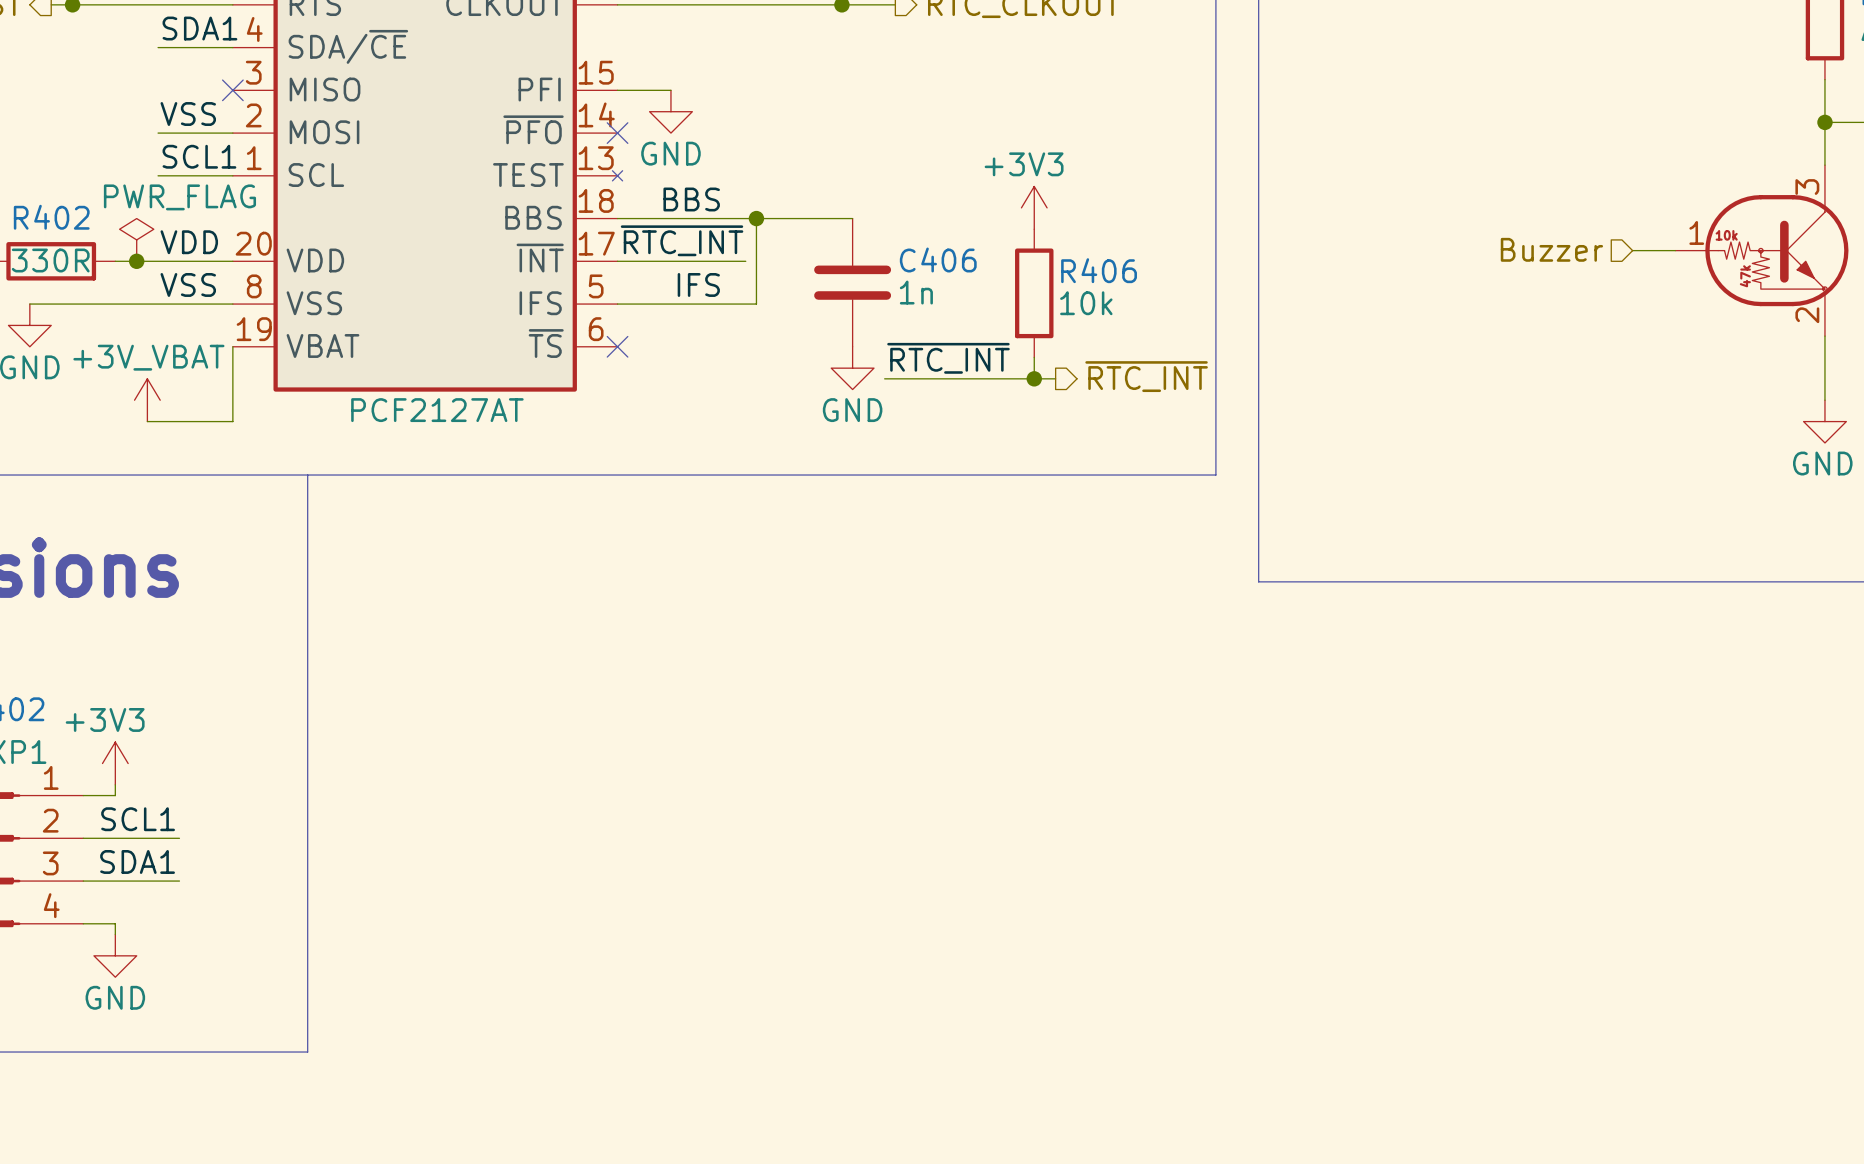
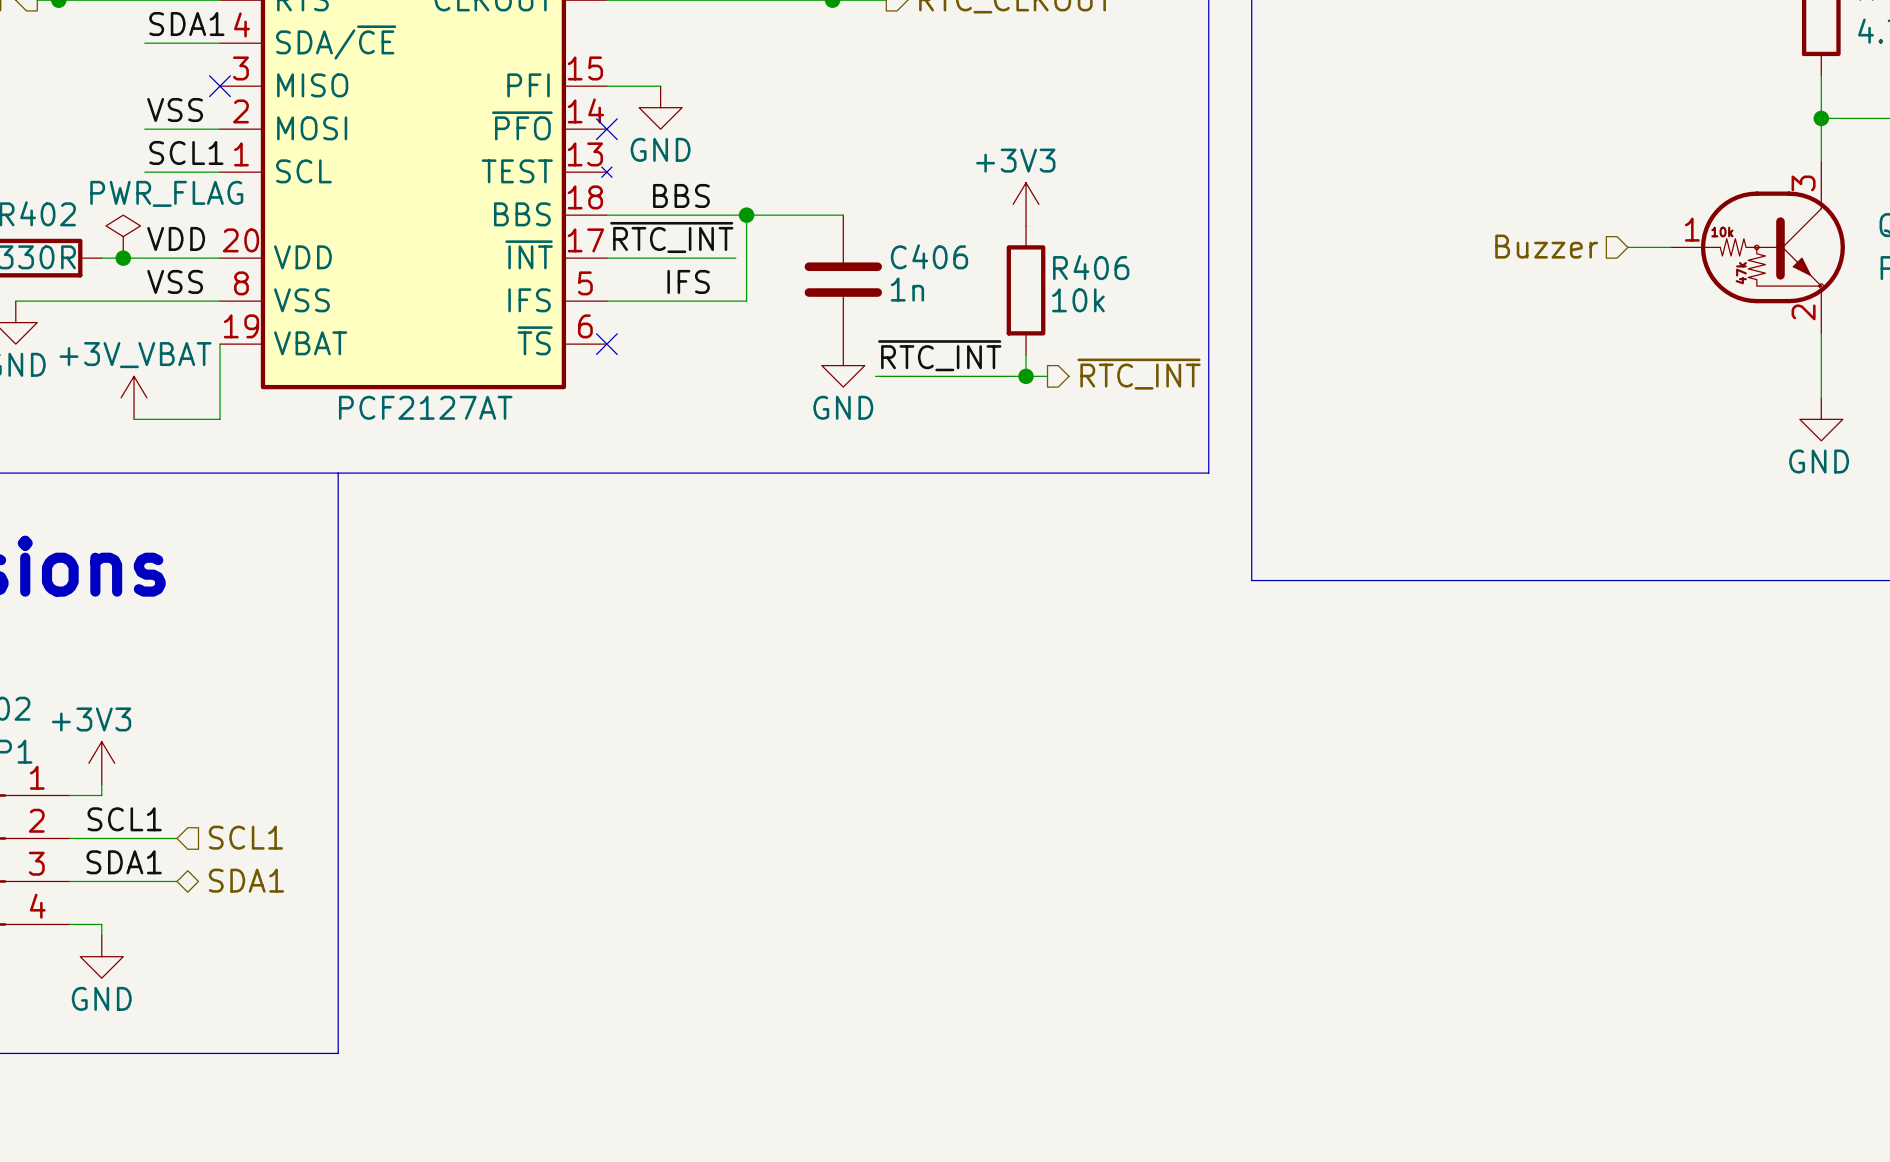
line: (307, 475) (307, 1052) -> (338, 473) (338, 1053) (295, 1053)
hierarchical label: none -> SCL1 (245, 837)
wire: none -> (166, 838) (176, 838)
hierarchical label: none -> SDA1 (246, 880)
wire: none -> (166, 881) (176, 881)

